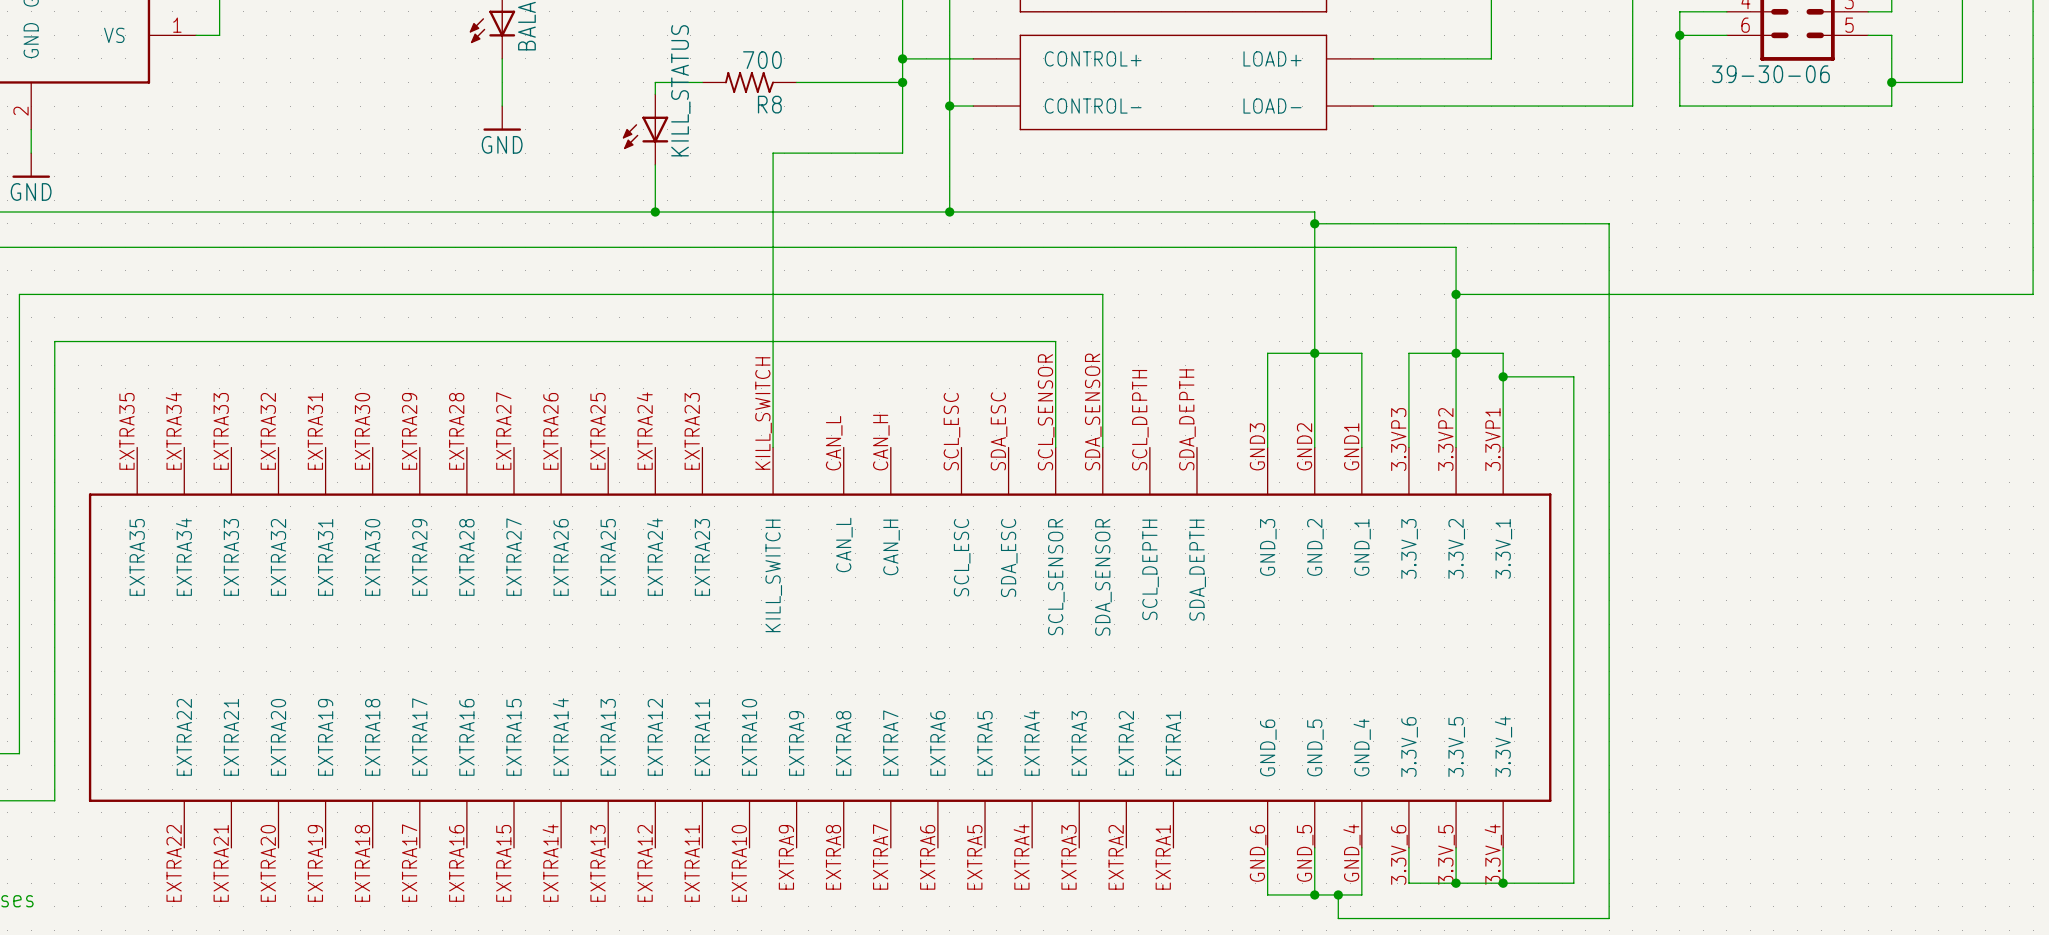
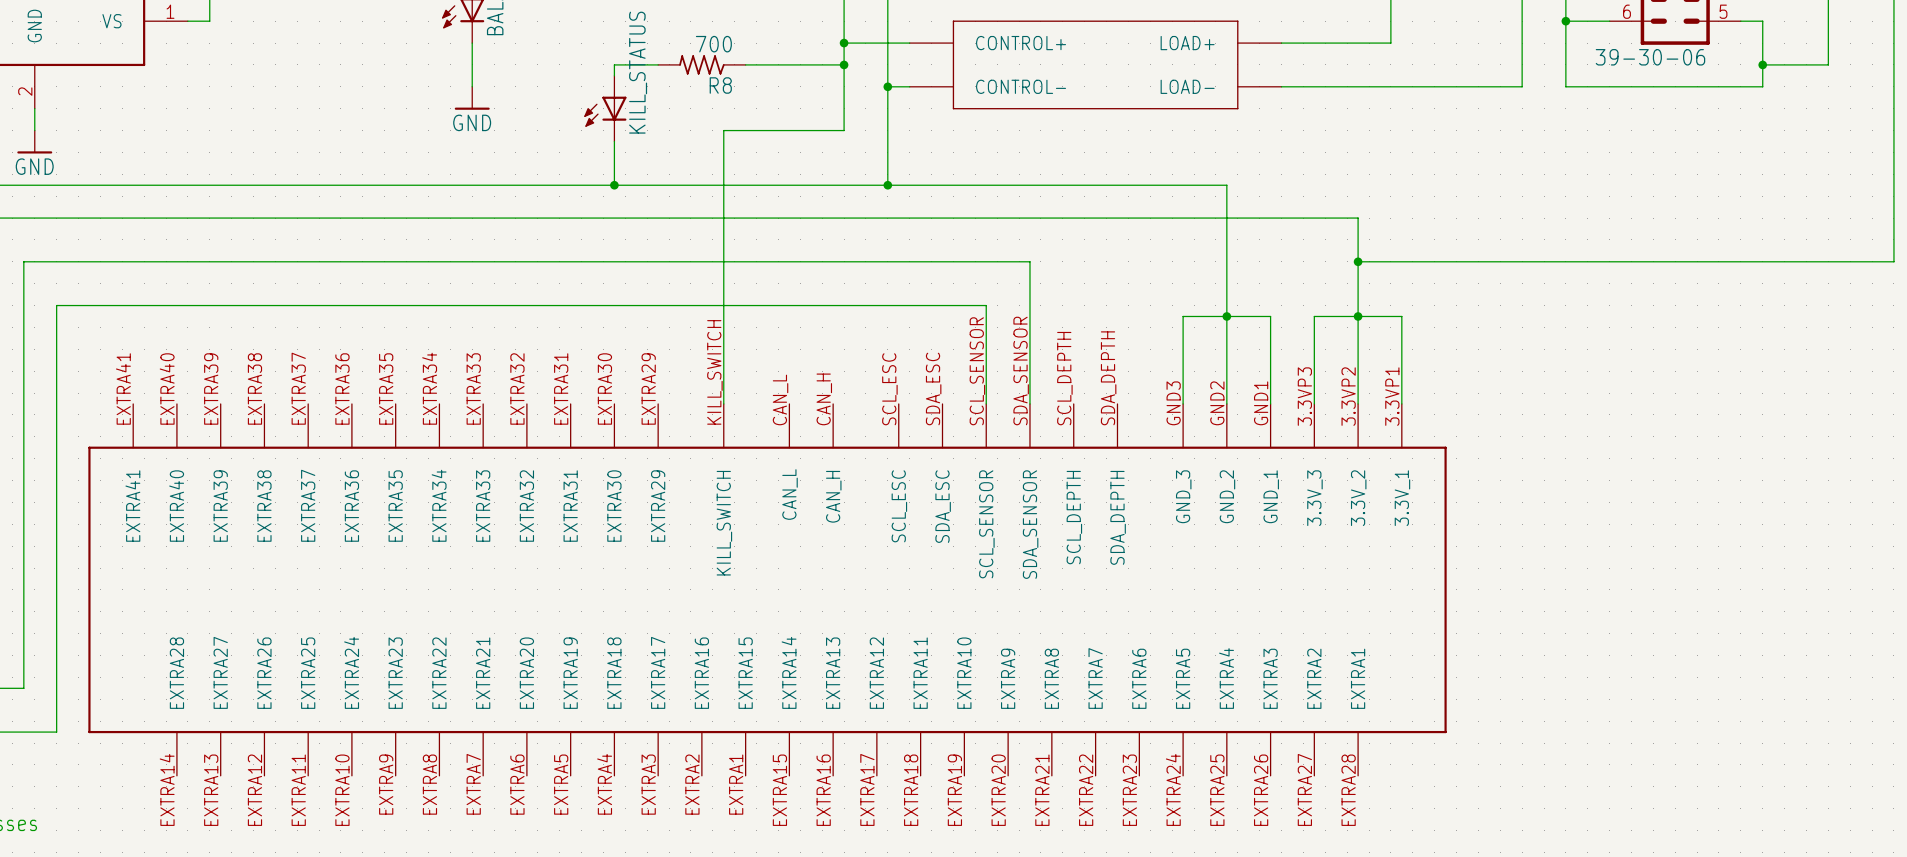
wire: (1314, 223) (1609, 223) (1609, 918) (1338, 918) (1338, 894) -> none
junction: (1314, 223) -> none
wire: (1503, 376) (1573, 376) (1573, 883) (1408, 883) (1408, 847) -> none
junction: (1503, 376) -> none
part symbol: [88, 447, 1552, 848] -> [88, 403, 1447, 776]
wire: (1267, 847) (1267, 894) (1361, 894) (1361, 847) -> none
wire: (1314, 847) (1314, 894) -> none
wire: (1456, 847) (1456, 883) -> none
wire: (1503, 847) (1503, 883) -> none
junction: (1456, 883) -> none
junction: (1503, 883) -> none
junction: (1314, 894) -> none
junction: (1338, 894) -> none

